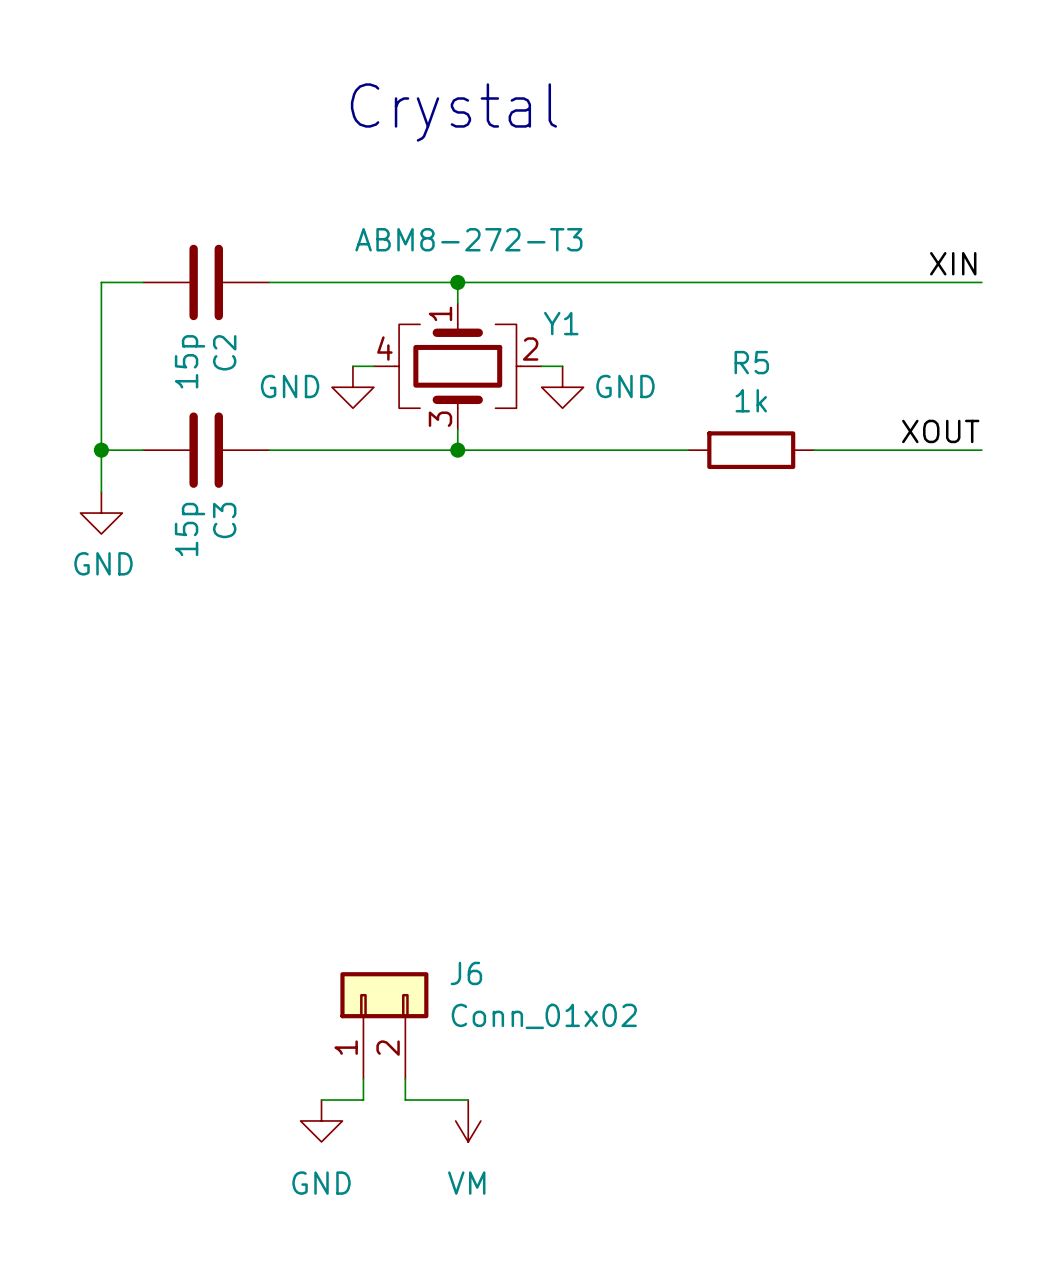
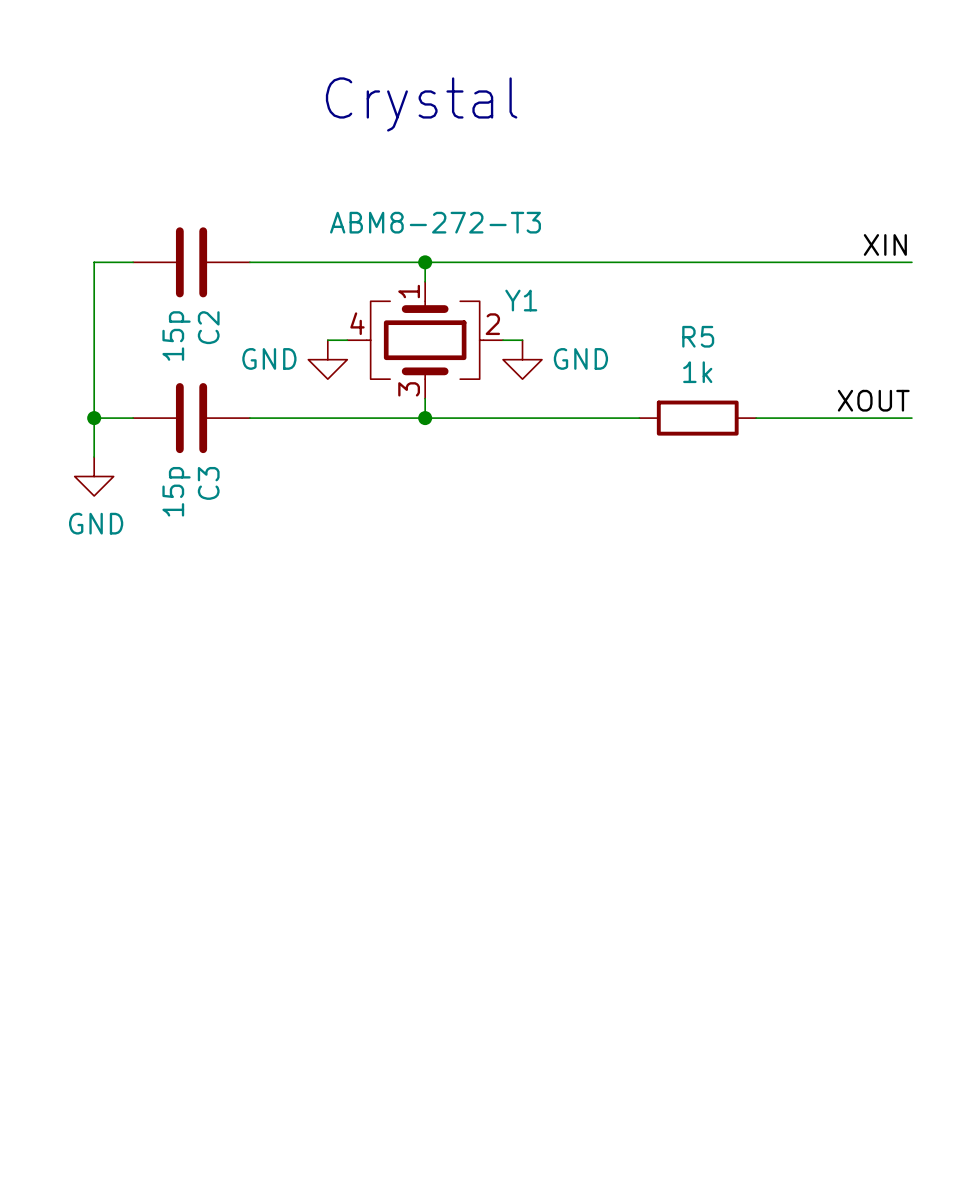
J6: Conn_01x02 (384, 1025) -> none
wire: (363, 1079) (363, 1100) (321, 1100) -> none
wire: (405, 1079) (405, 1100) (468, 1100) -> none
power symbol: GND (321, 1120) -> none
power symbol: VM (468, 1120) -> none

